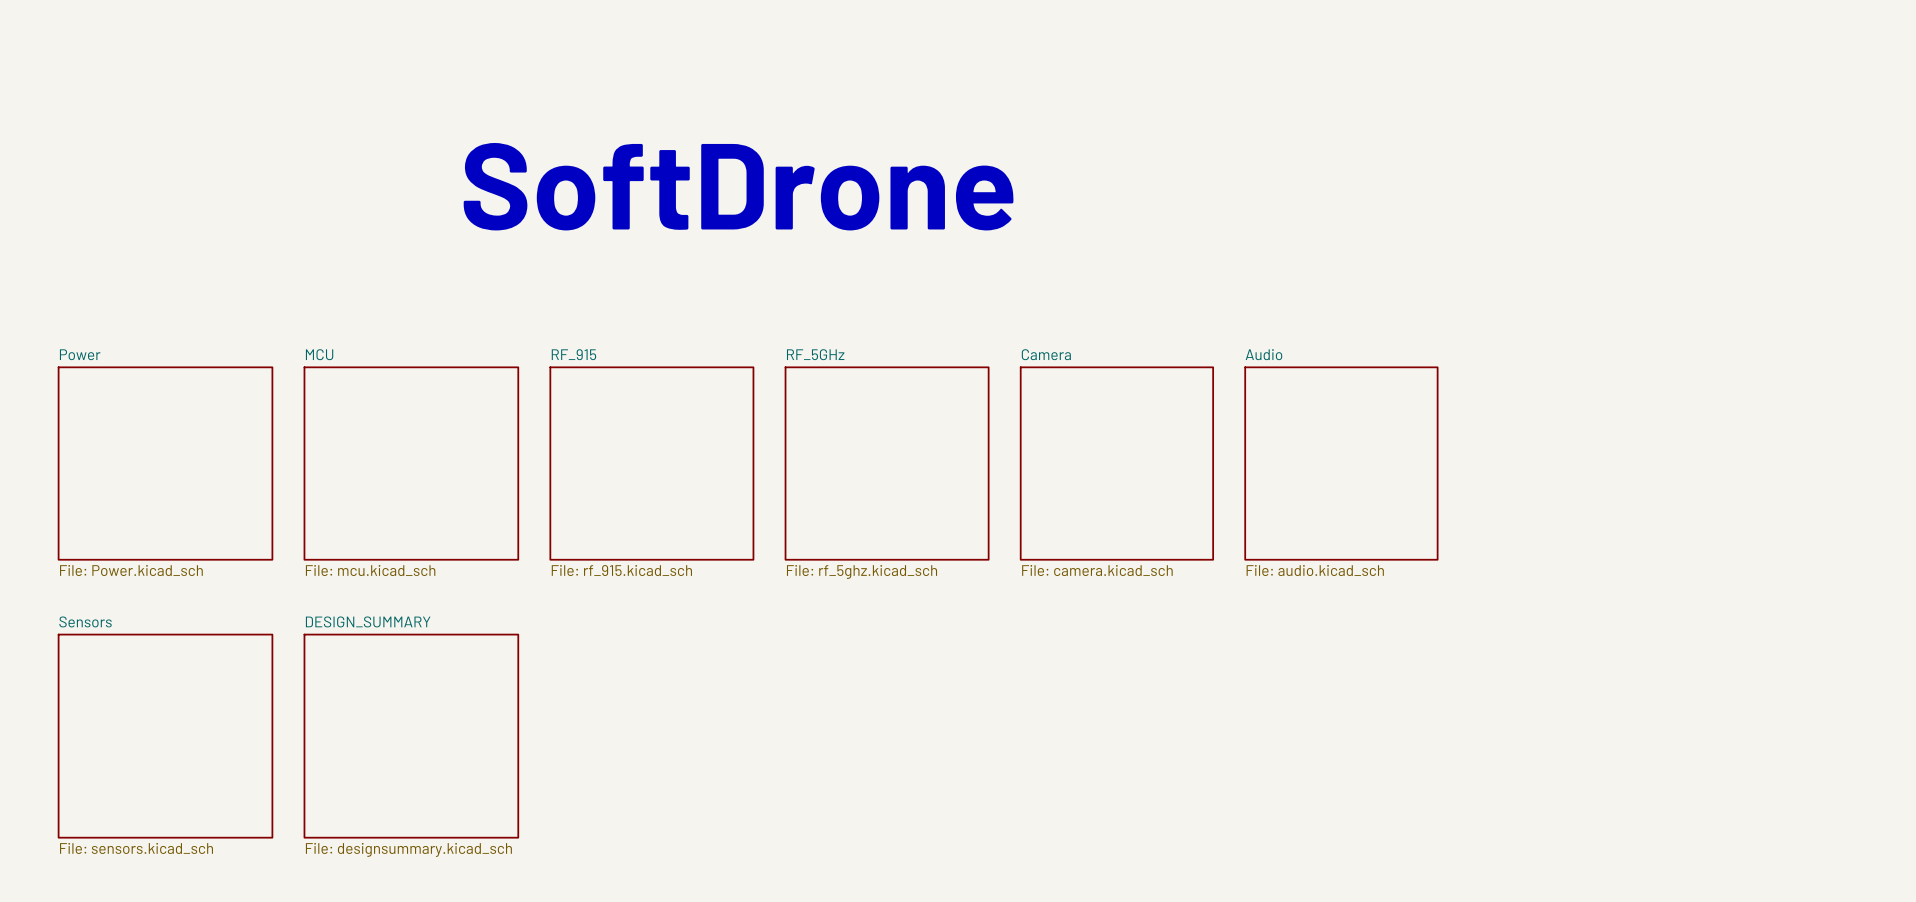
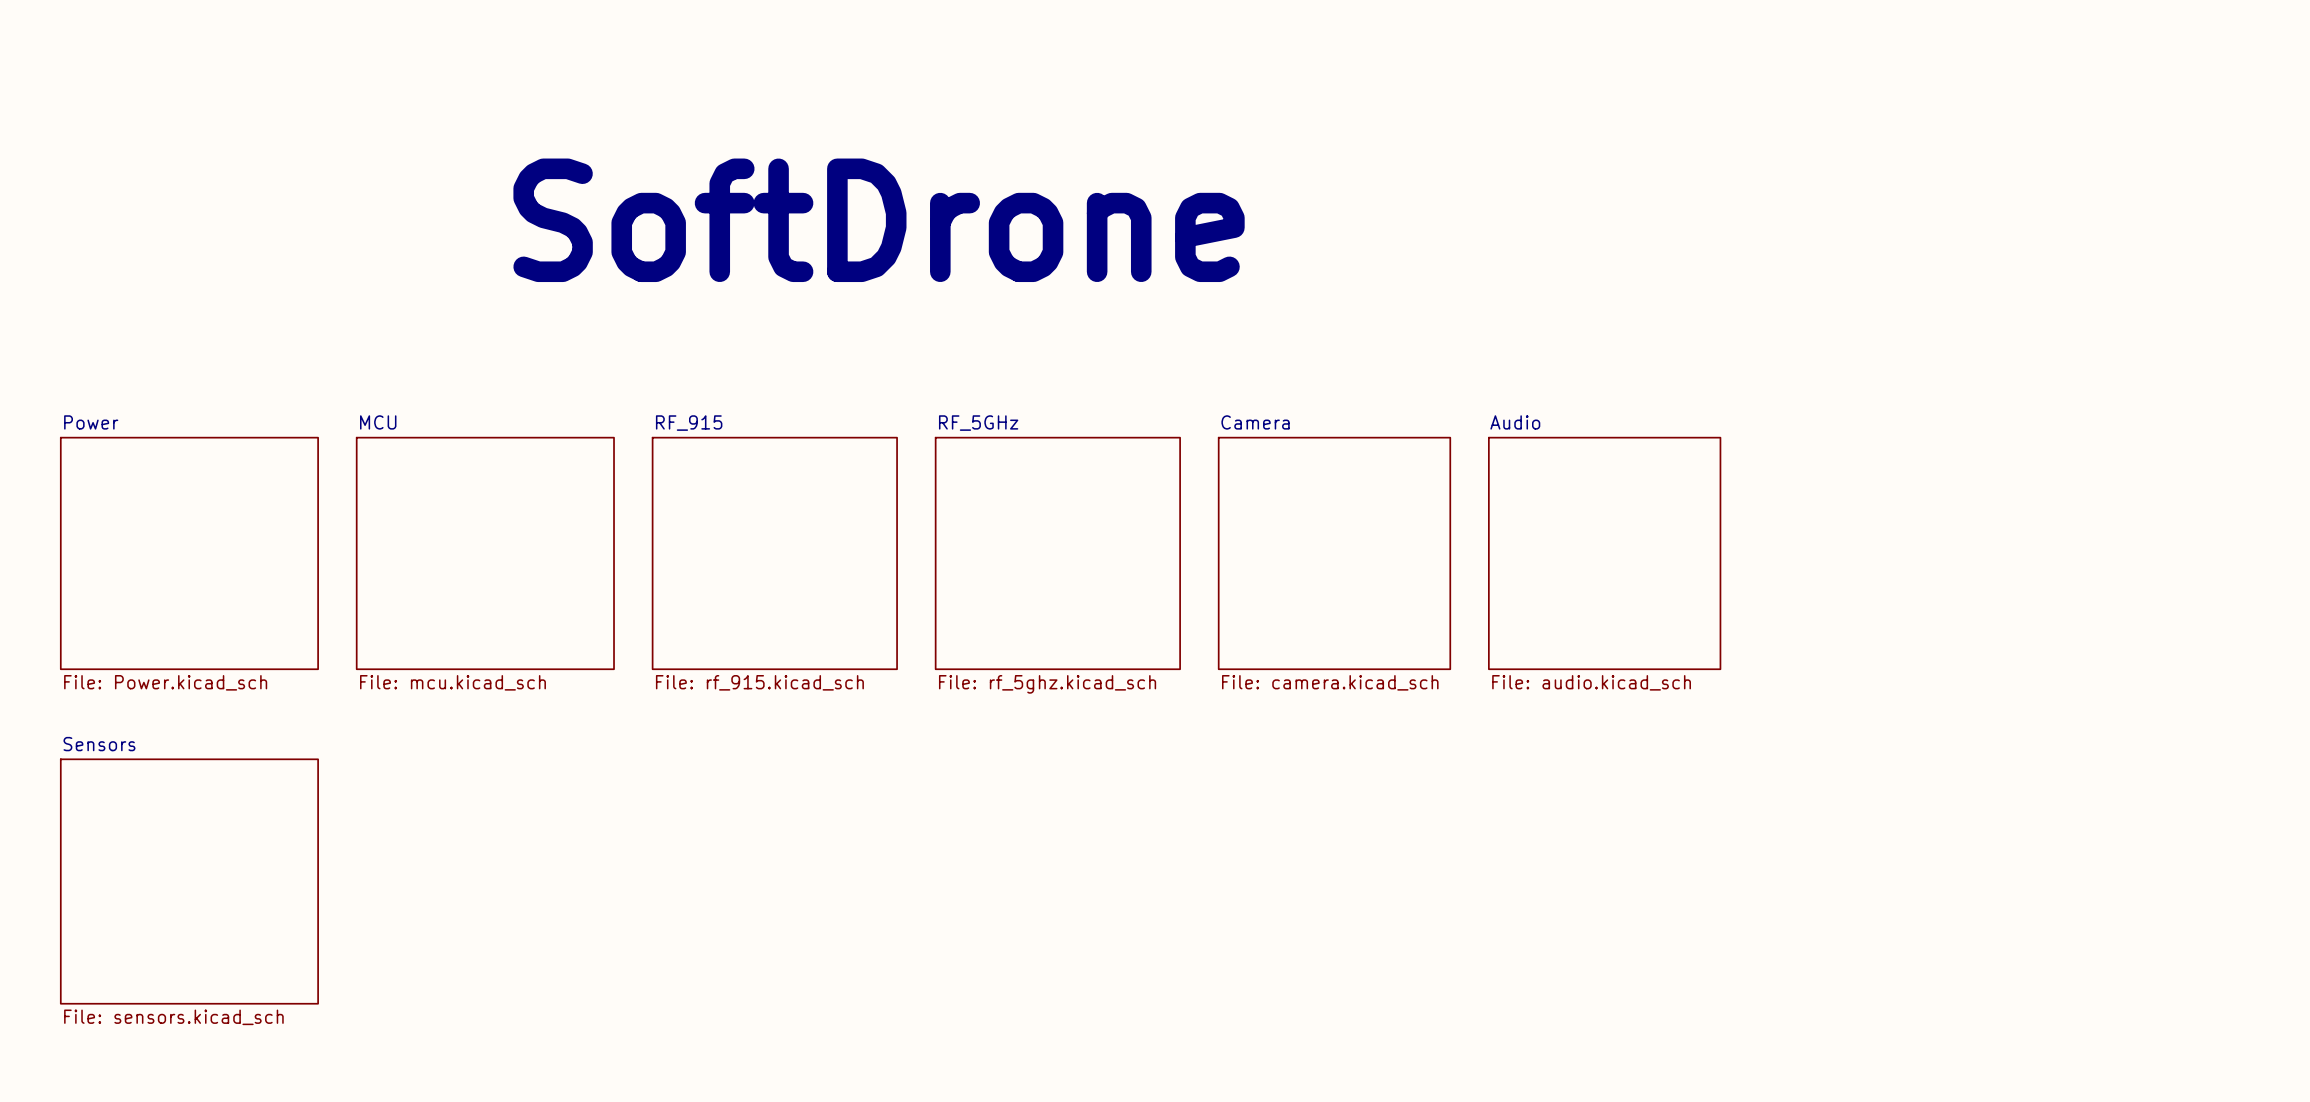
sheet DESIGN_SUMMARY: File: designsummary.kicad_sch (411, 736) -> none

